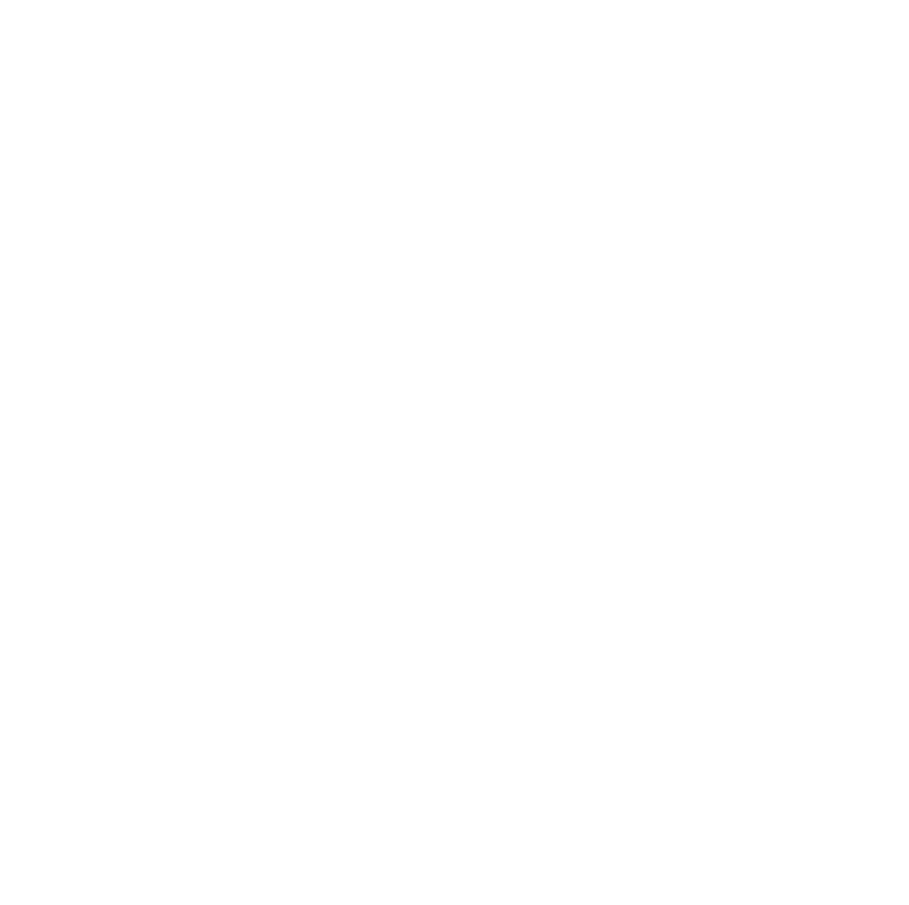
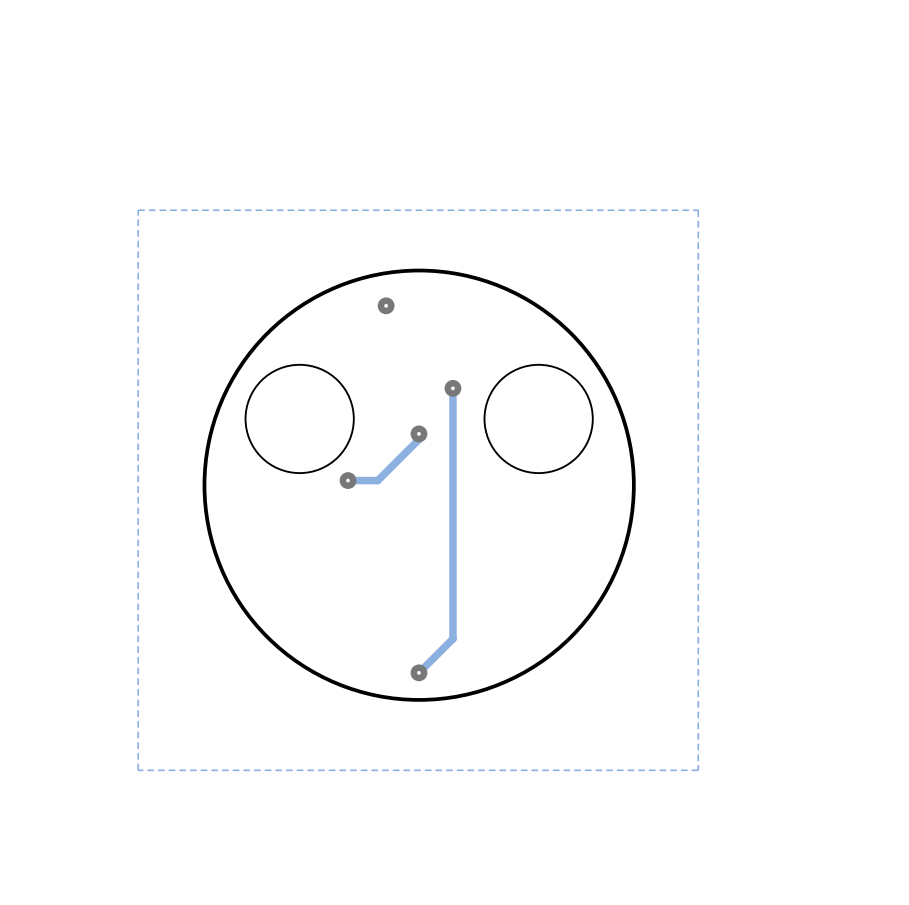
zone outline: none -> (698, 210) (698, 770) (138, 770) (138, 210) (698, 210)
round board edge: none -> [202, 268, 636, 702]
via: none -> (386, 305)
round board edge: none -> [244, 363, 355, 475]
round board edge: none -> [483, 363, 594, 475]
track: none -> (452, 388) (452, 638) (418, 672)
via: none -> (452, 388)
track: none -> (418, 433) (418, 439) (377, 480) (348, 480)
via: none -> (418, 433)
via: none -> (348, 480)
via: none -> (418, 672)

